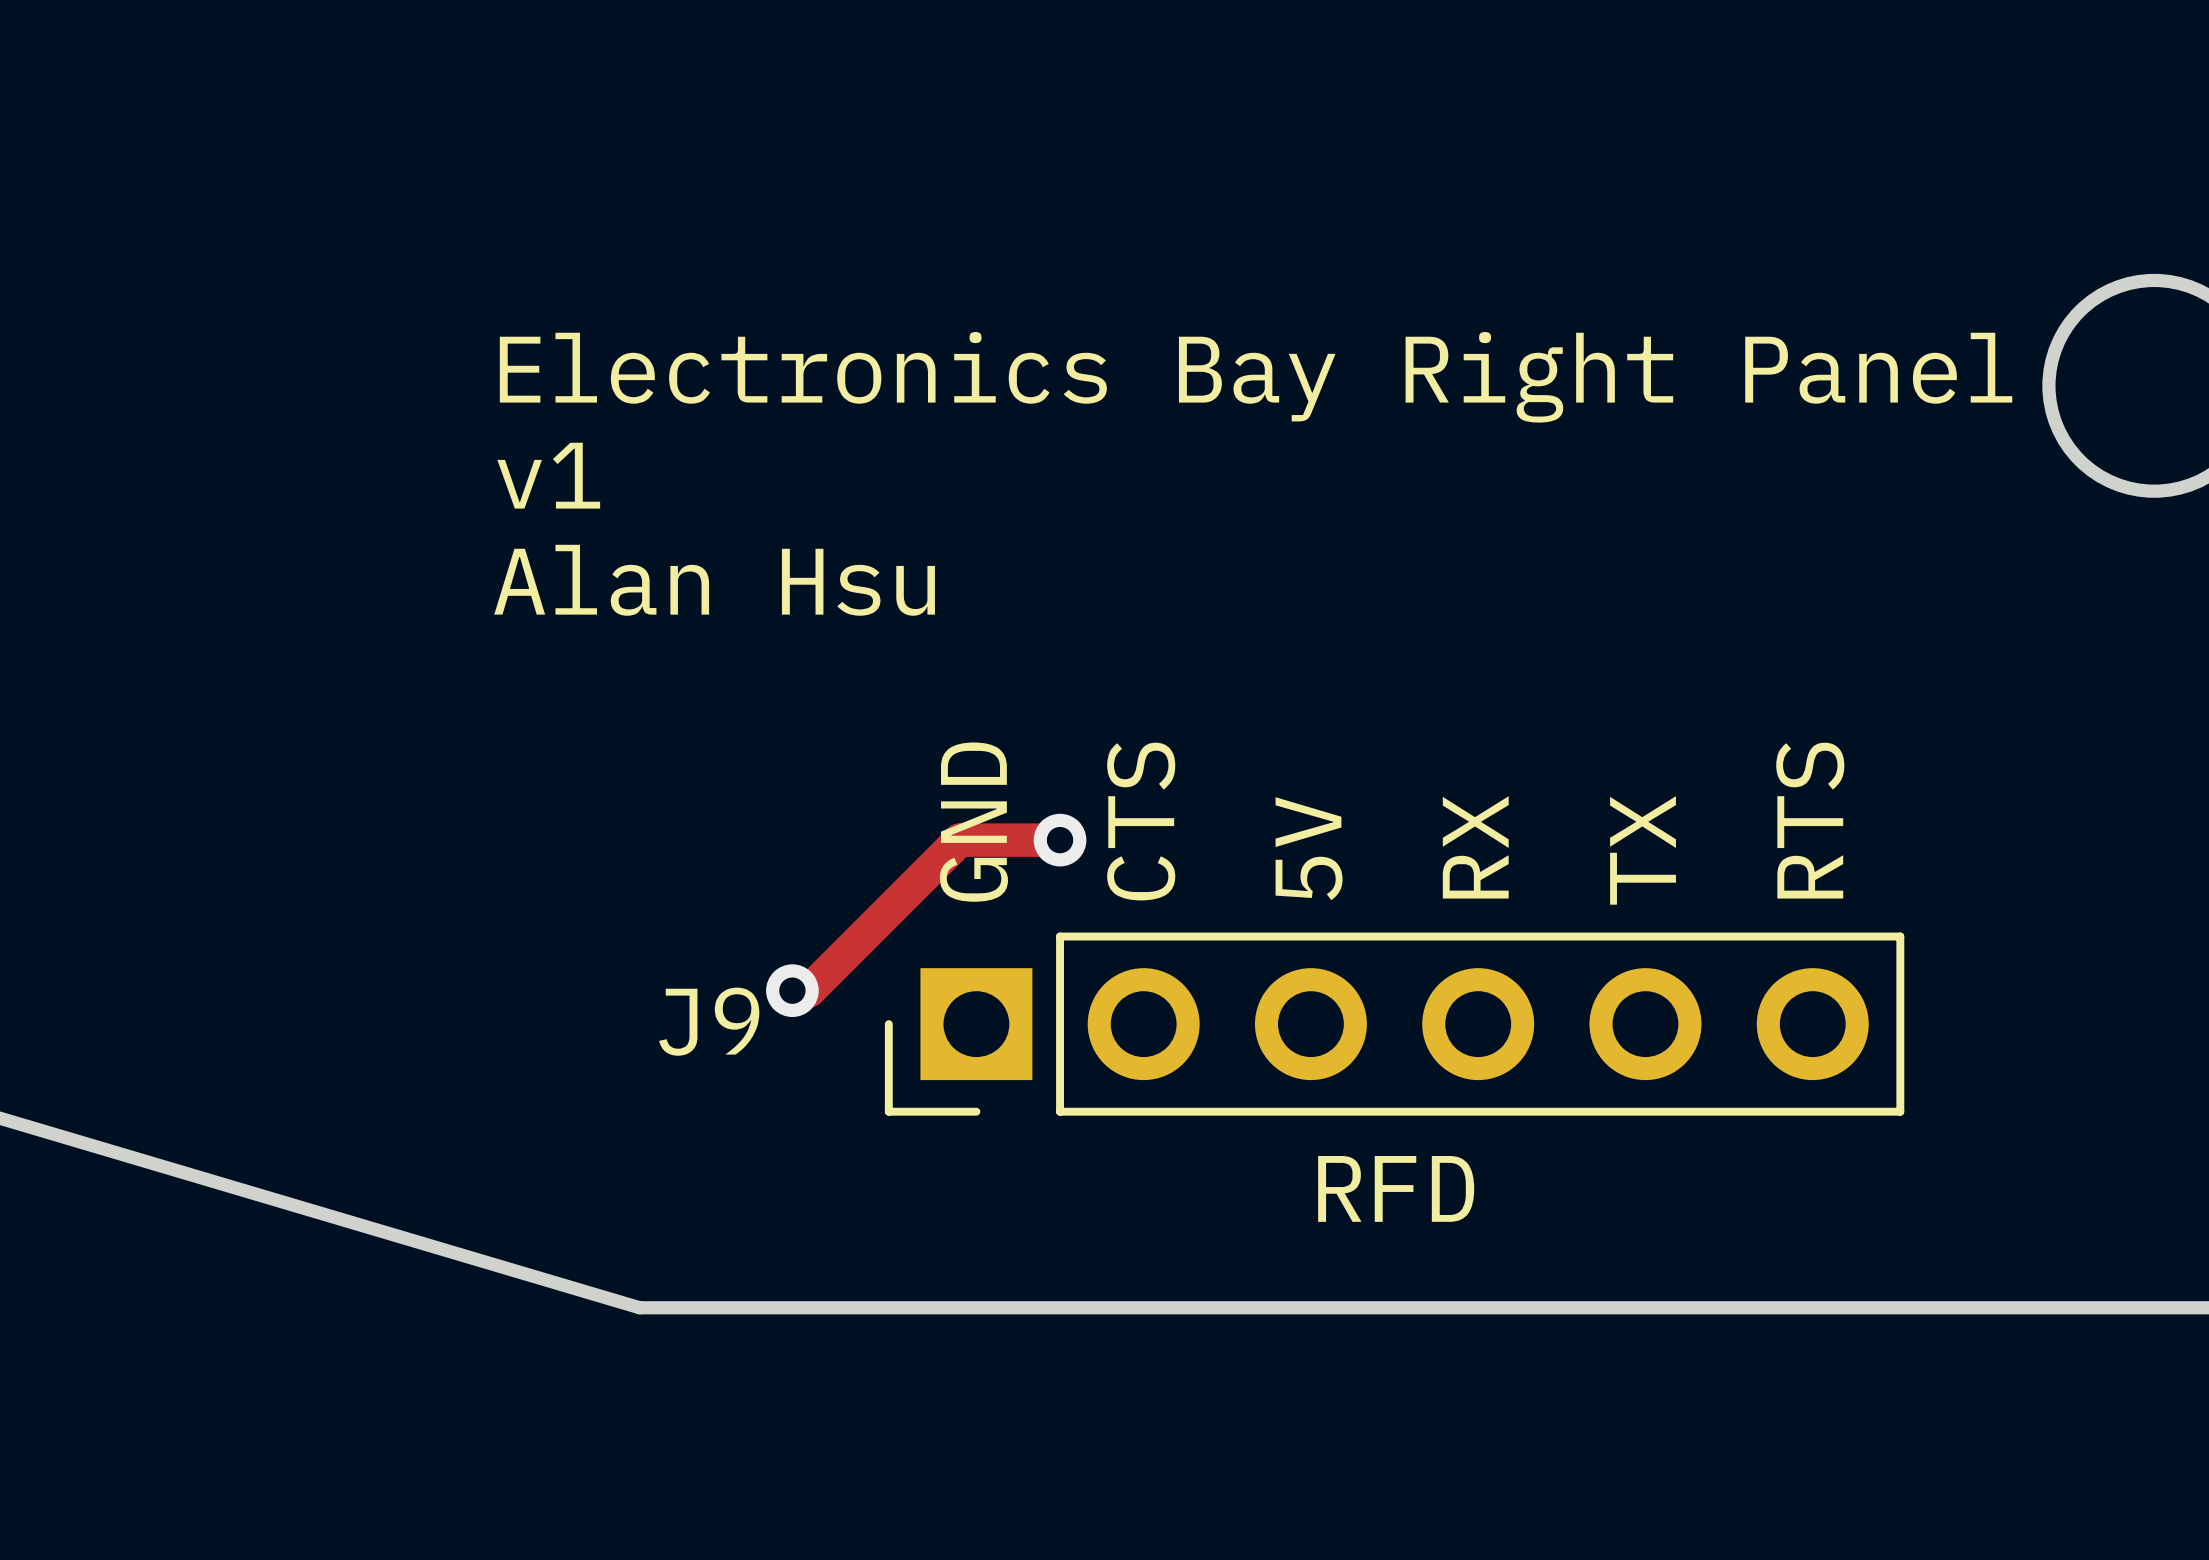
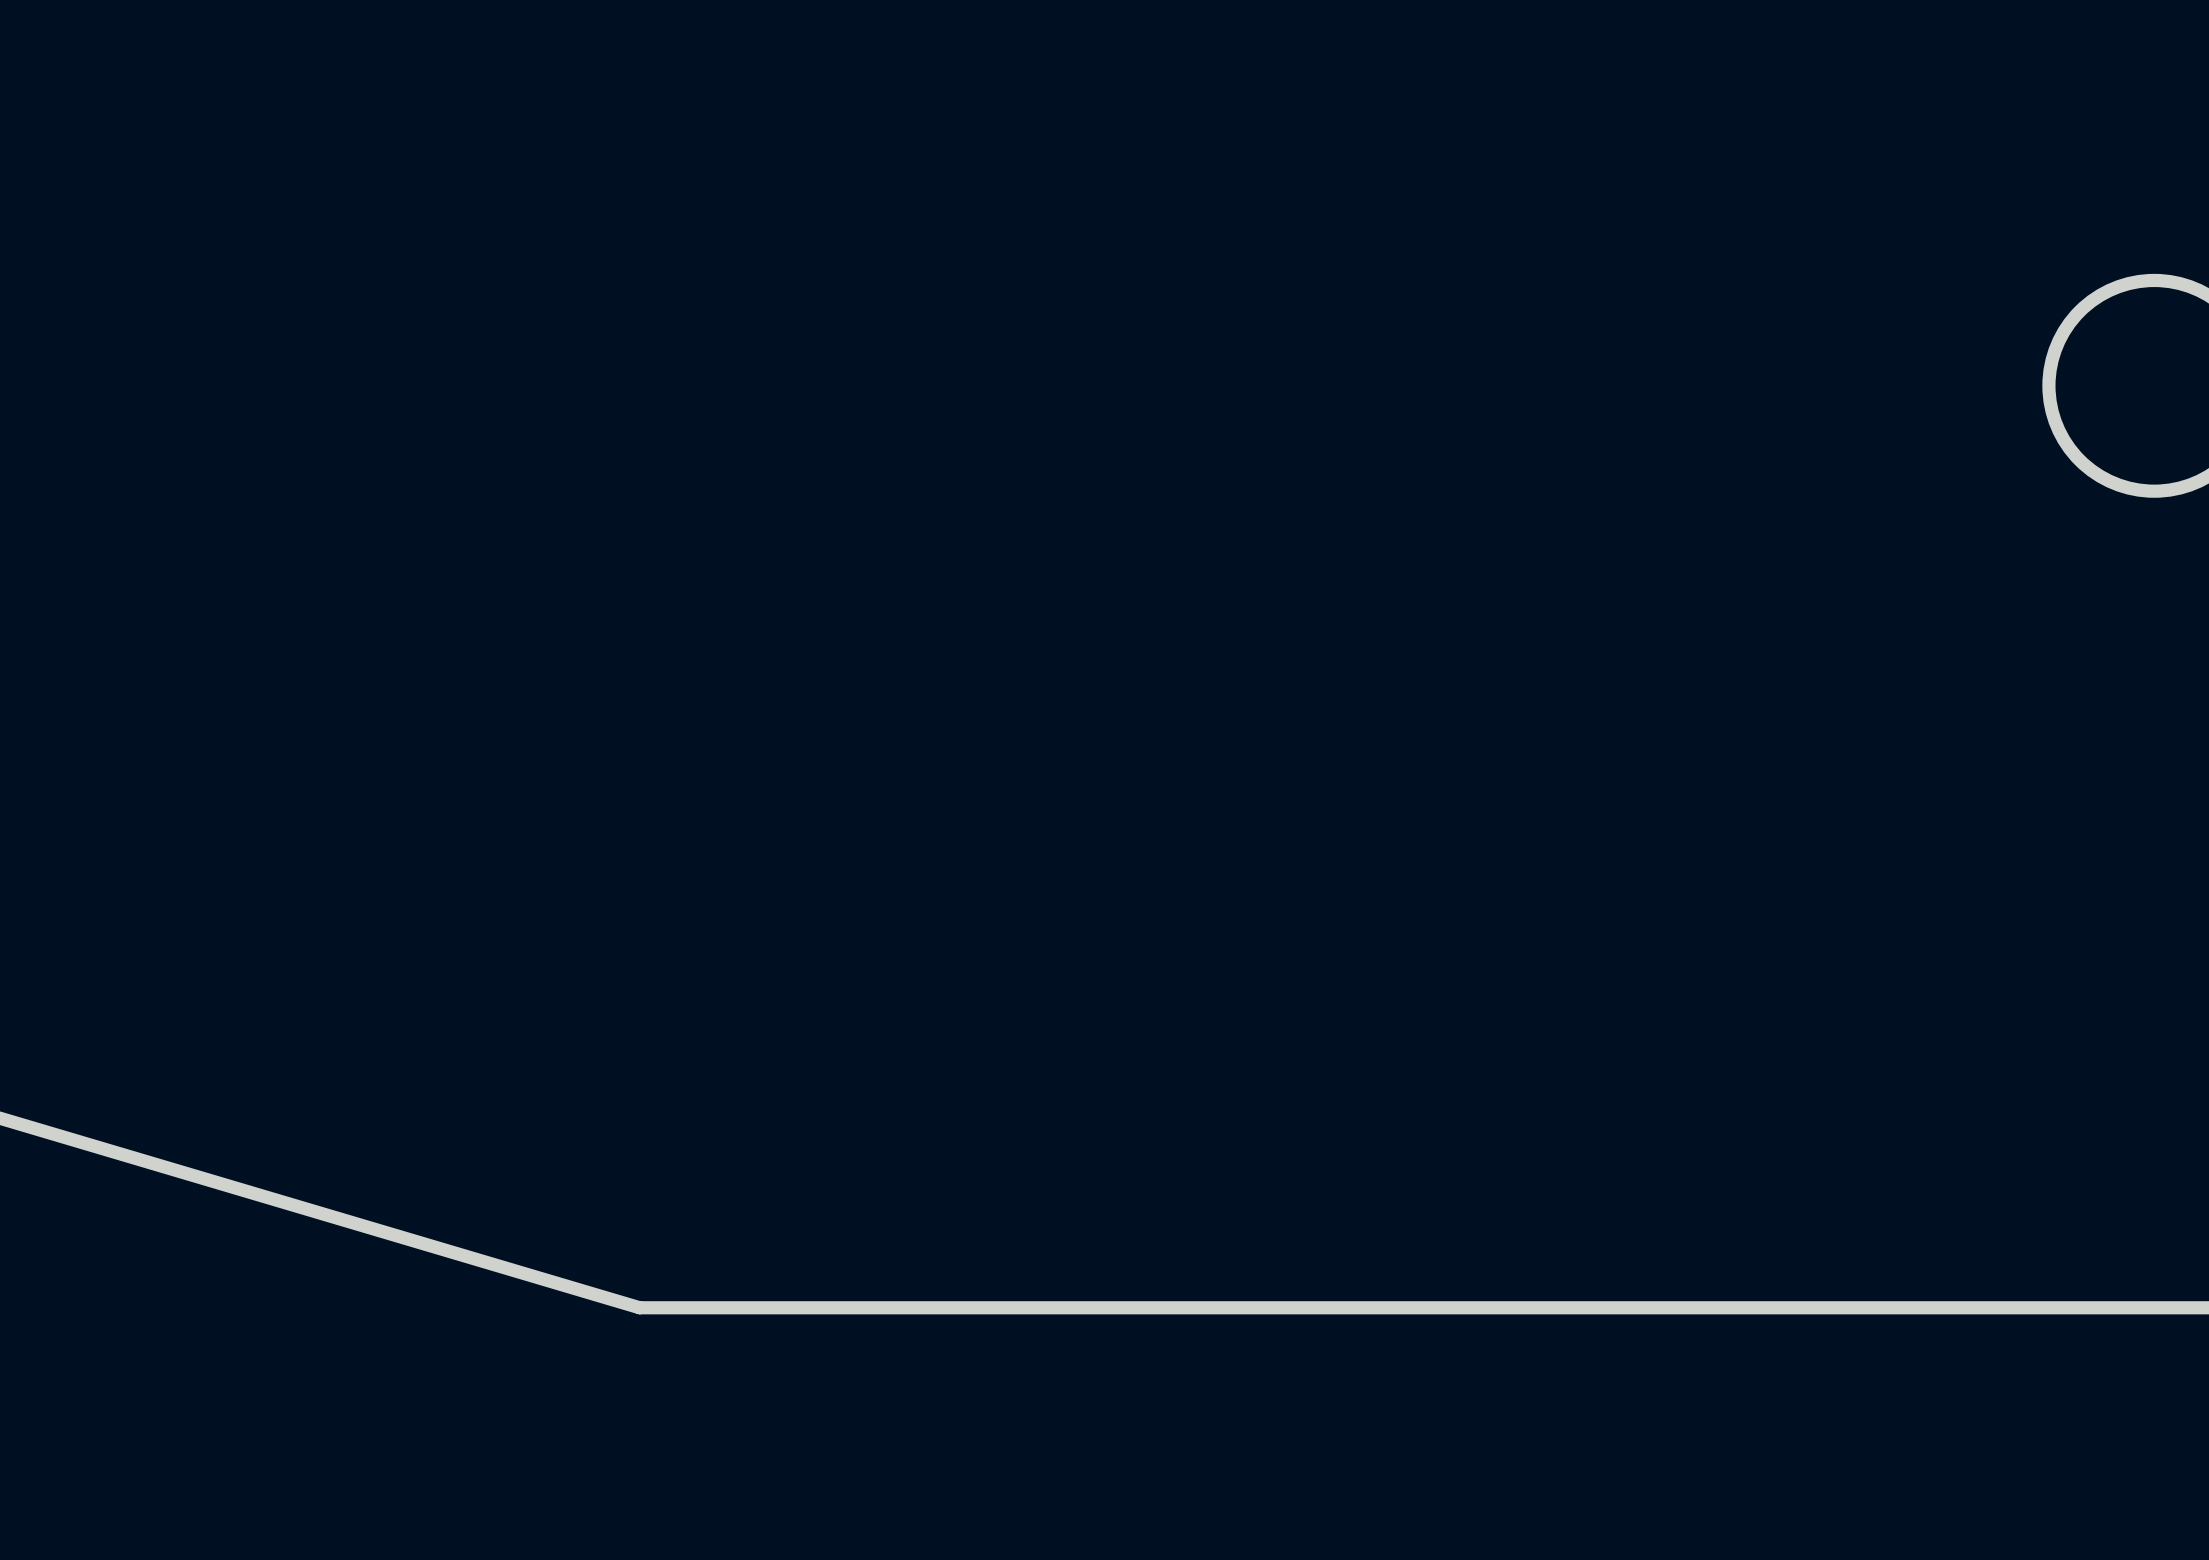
text: Electronics Bay Right Panel (1256, 377) -> none
text: v1 (548, 475) -> none
text: Alan Hsu (714, 580) -> none
text: RTS (1810, 820) -> none
text: CTS (1141, 821) -> none
text: GND (973, 822) -> none
track: (1060, 840) (959, 840) (809, 990) (792, 990) -> none
via: (1060, 840) -> none
text: RX (1475, 847) -> none
text: 5V (1309, 848) -> none
text: TX (1643, 850) -> none
via: (792, 990) -> none
J9: RFD (1394, 1024) -> none

